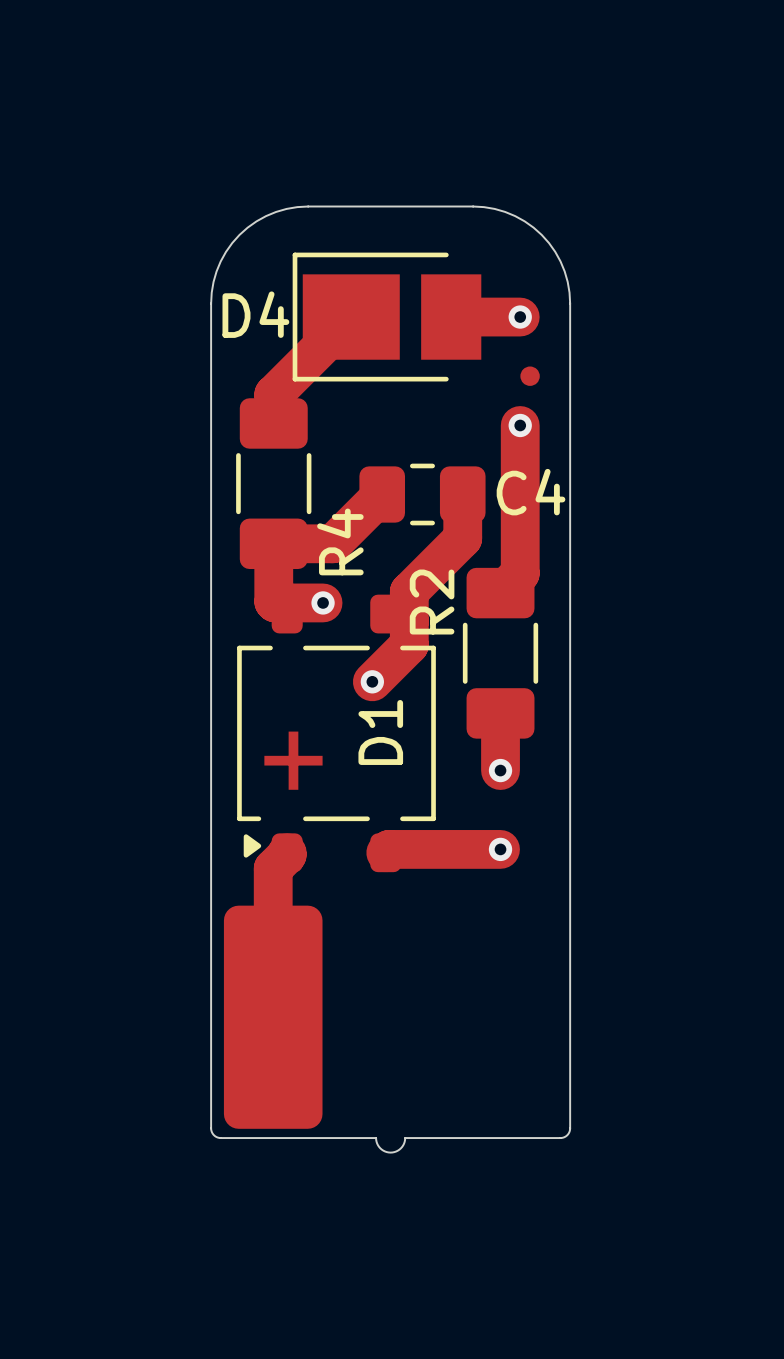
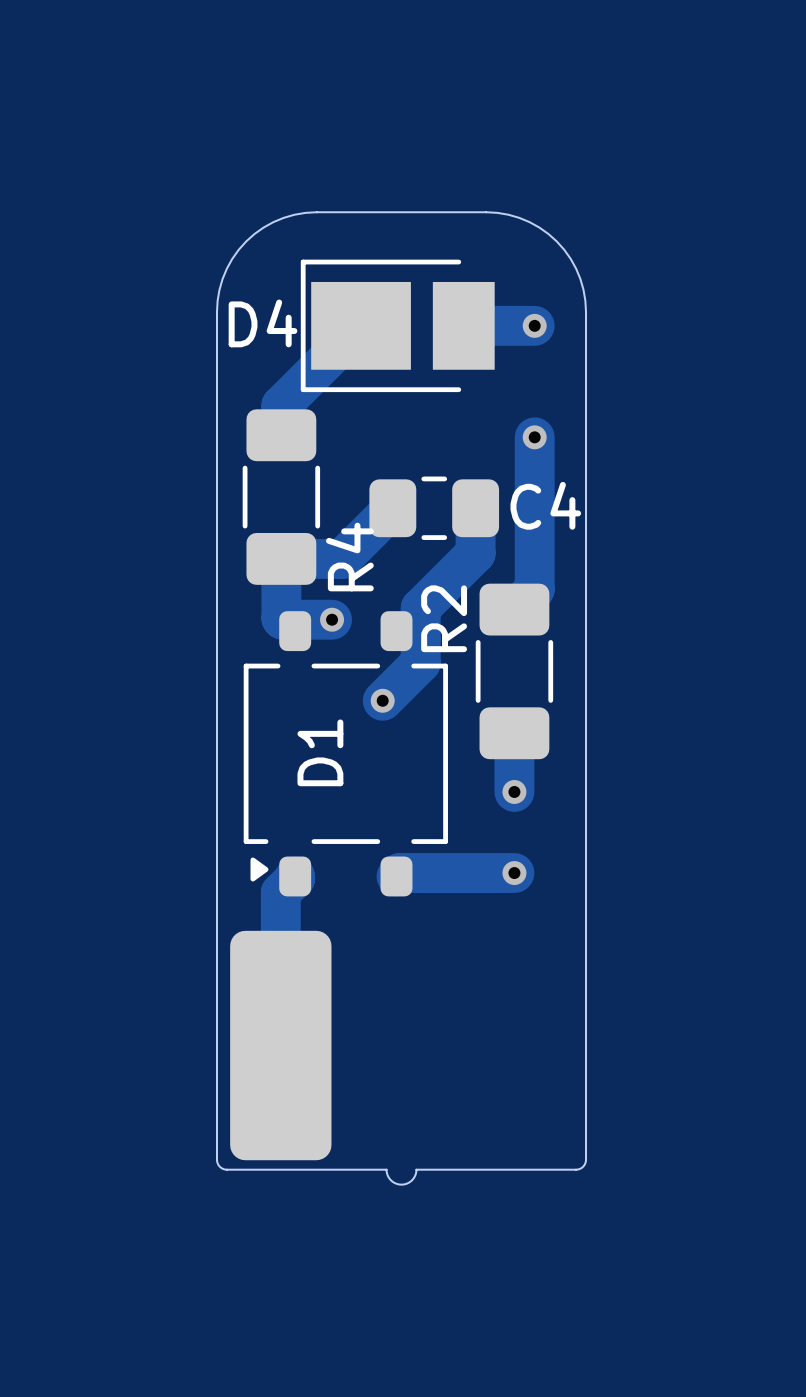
part: (530, 376) -> none
D1 name position: D1 (380, 732) -> D1 (320, 752)
part: (293, 760) -> none

